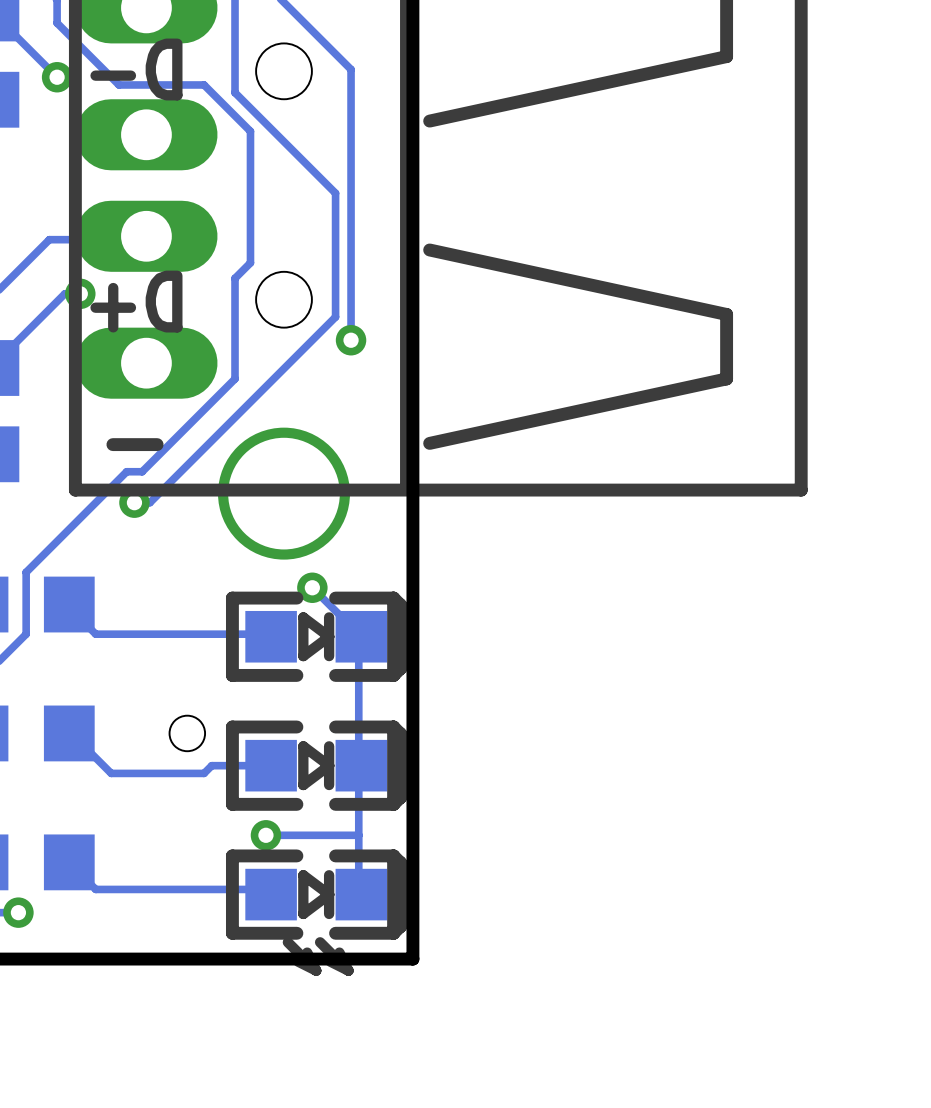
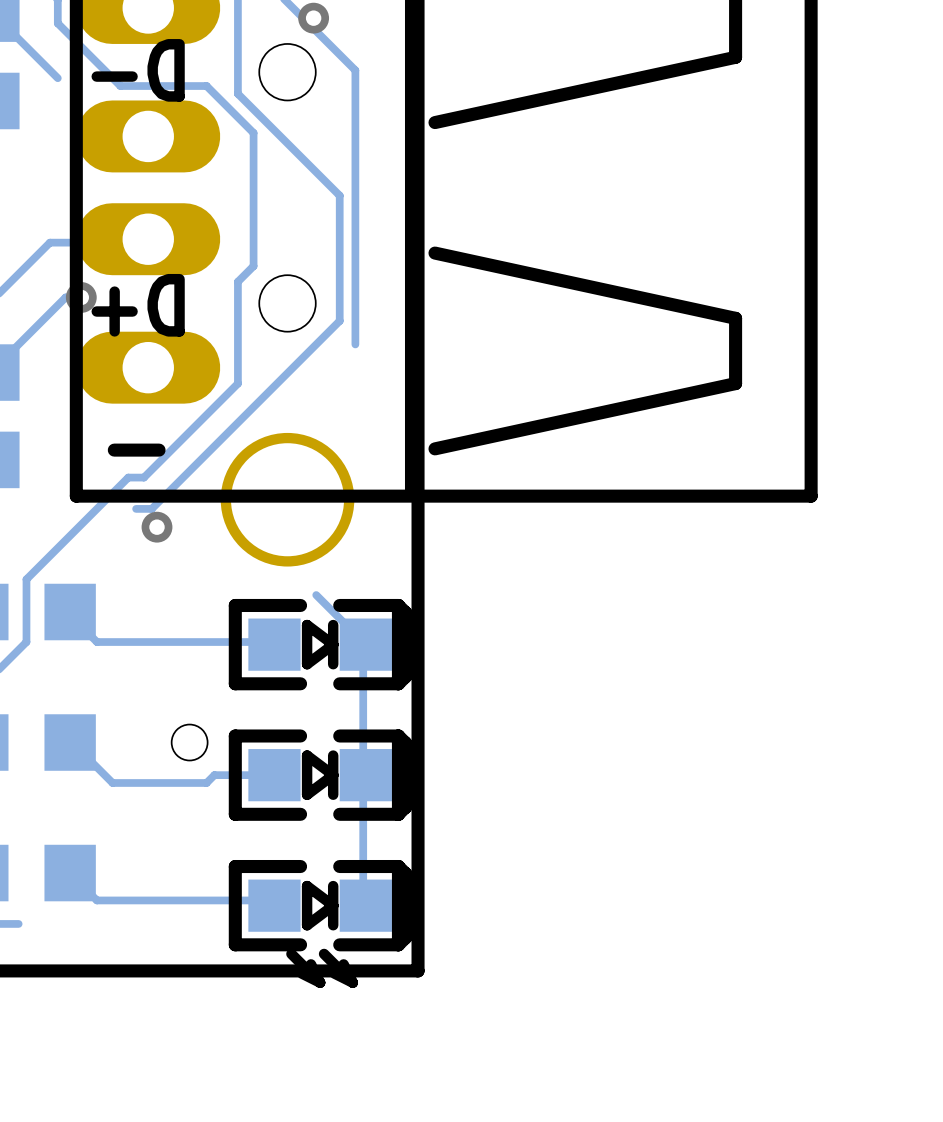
via: none -> (313, 18)
via: (57, 77) -> none
via: (351, 340) -> none
via position: (134, 502) -> (157, 527)
via: (312, 587) -> none
via: (265, 835) -> none
track: (358, 835) (265, 835) -> none
via: (18, 912) -> none

